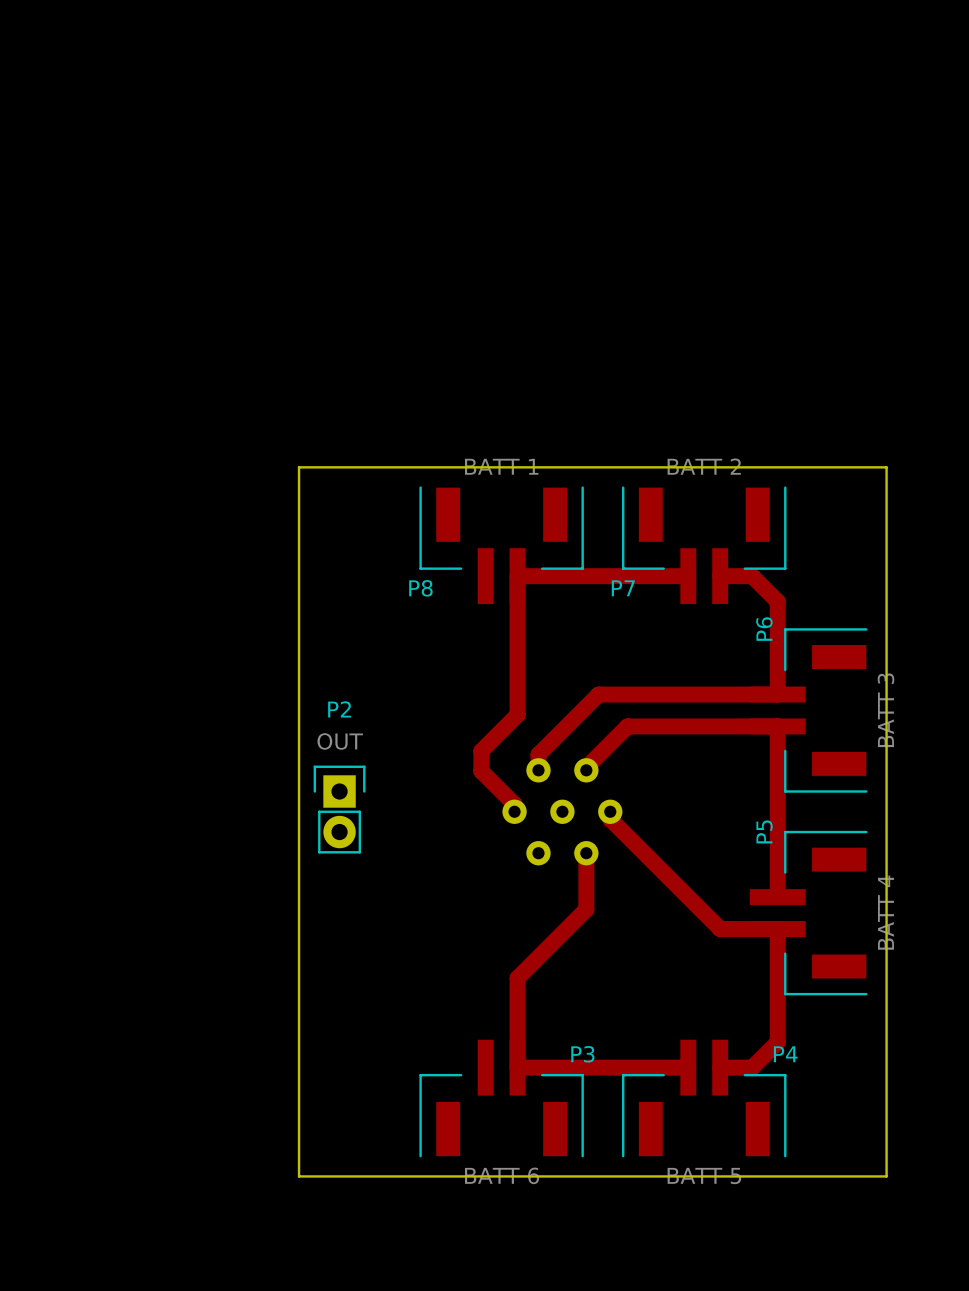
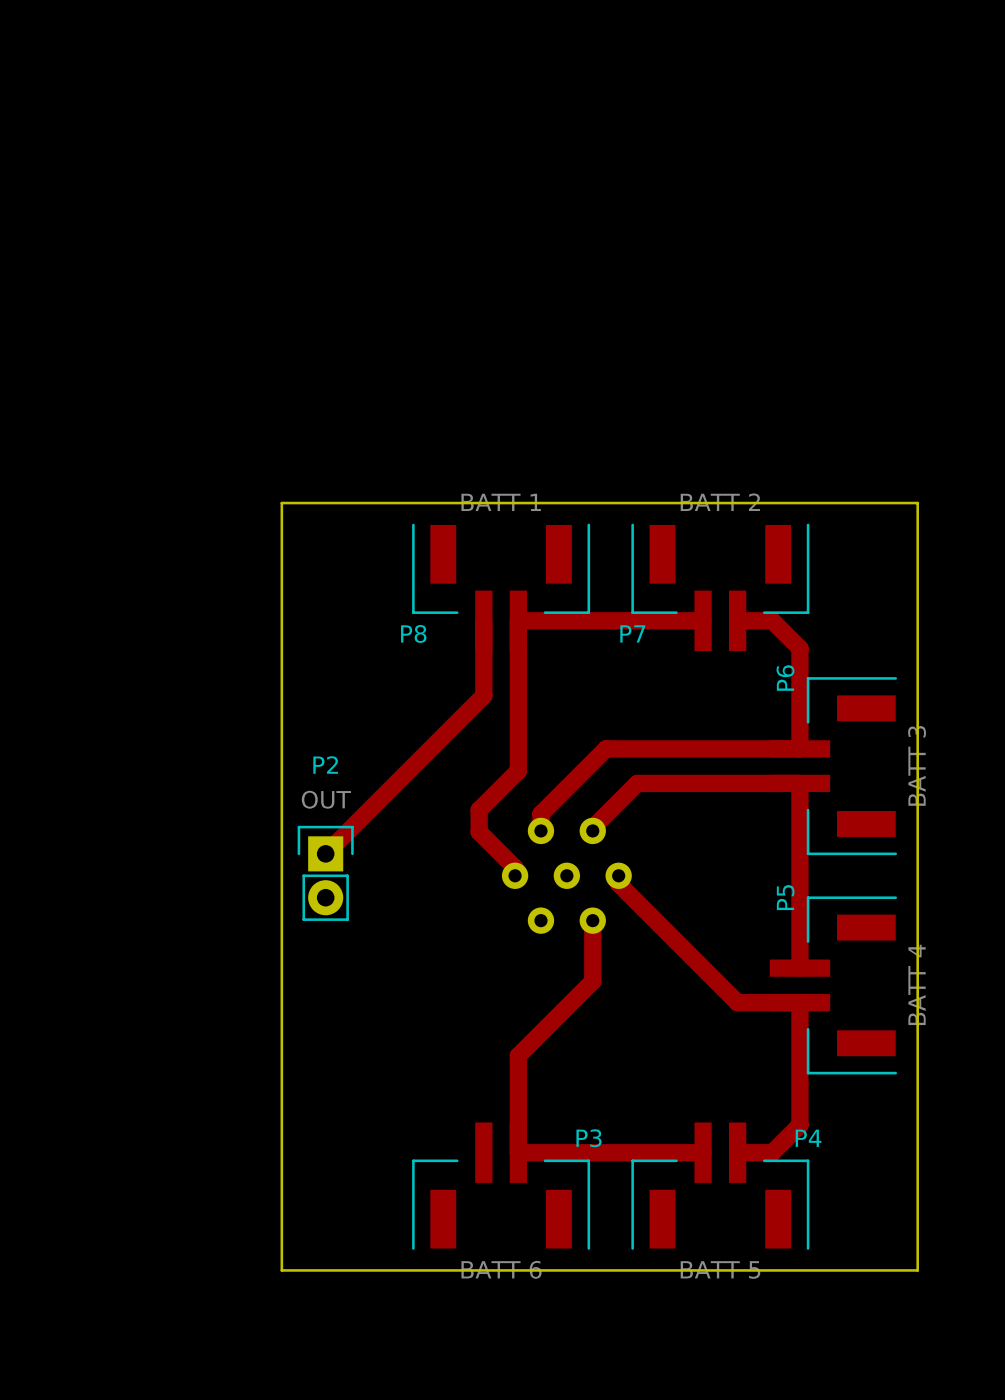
top track: none -> (483, 620) (483, 695) (325, 853)

